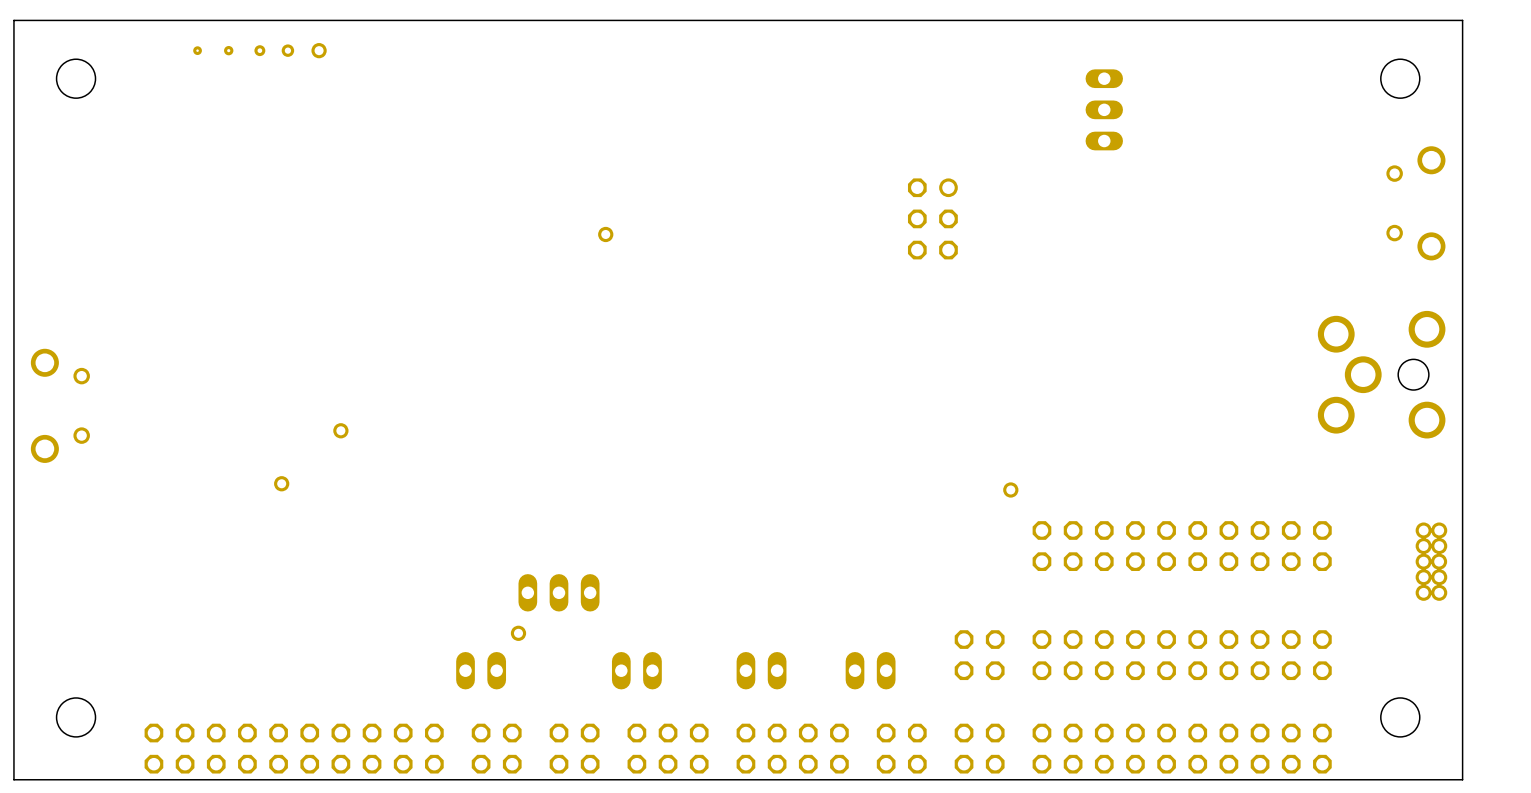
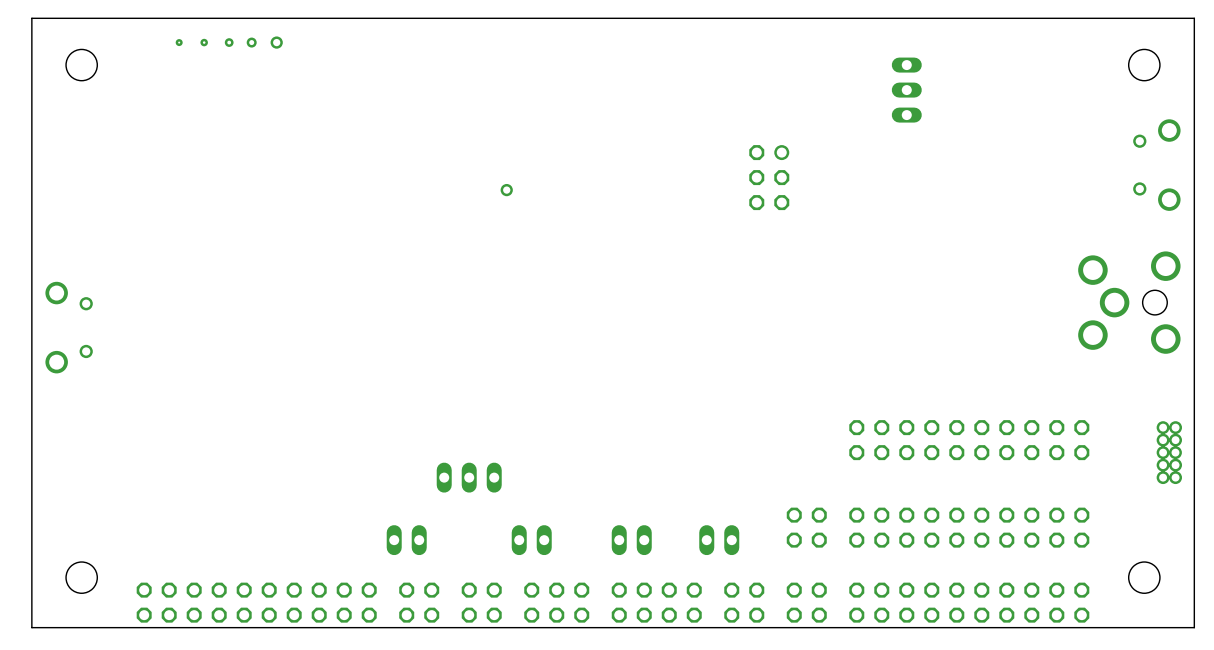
part: (340, 430) -> none
part: (281, 483) -> none
part: (1010, 489) -> none
part: (518, 633) -> none

